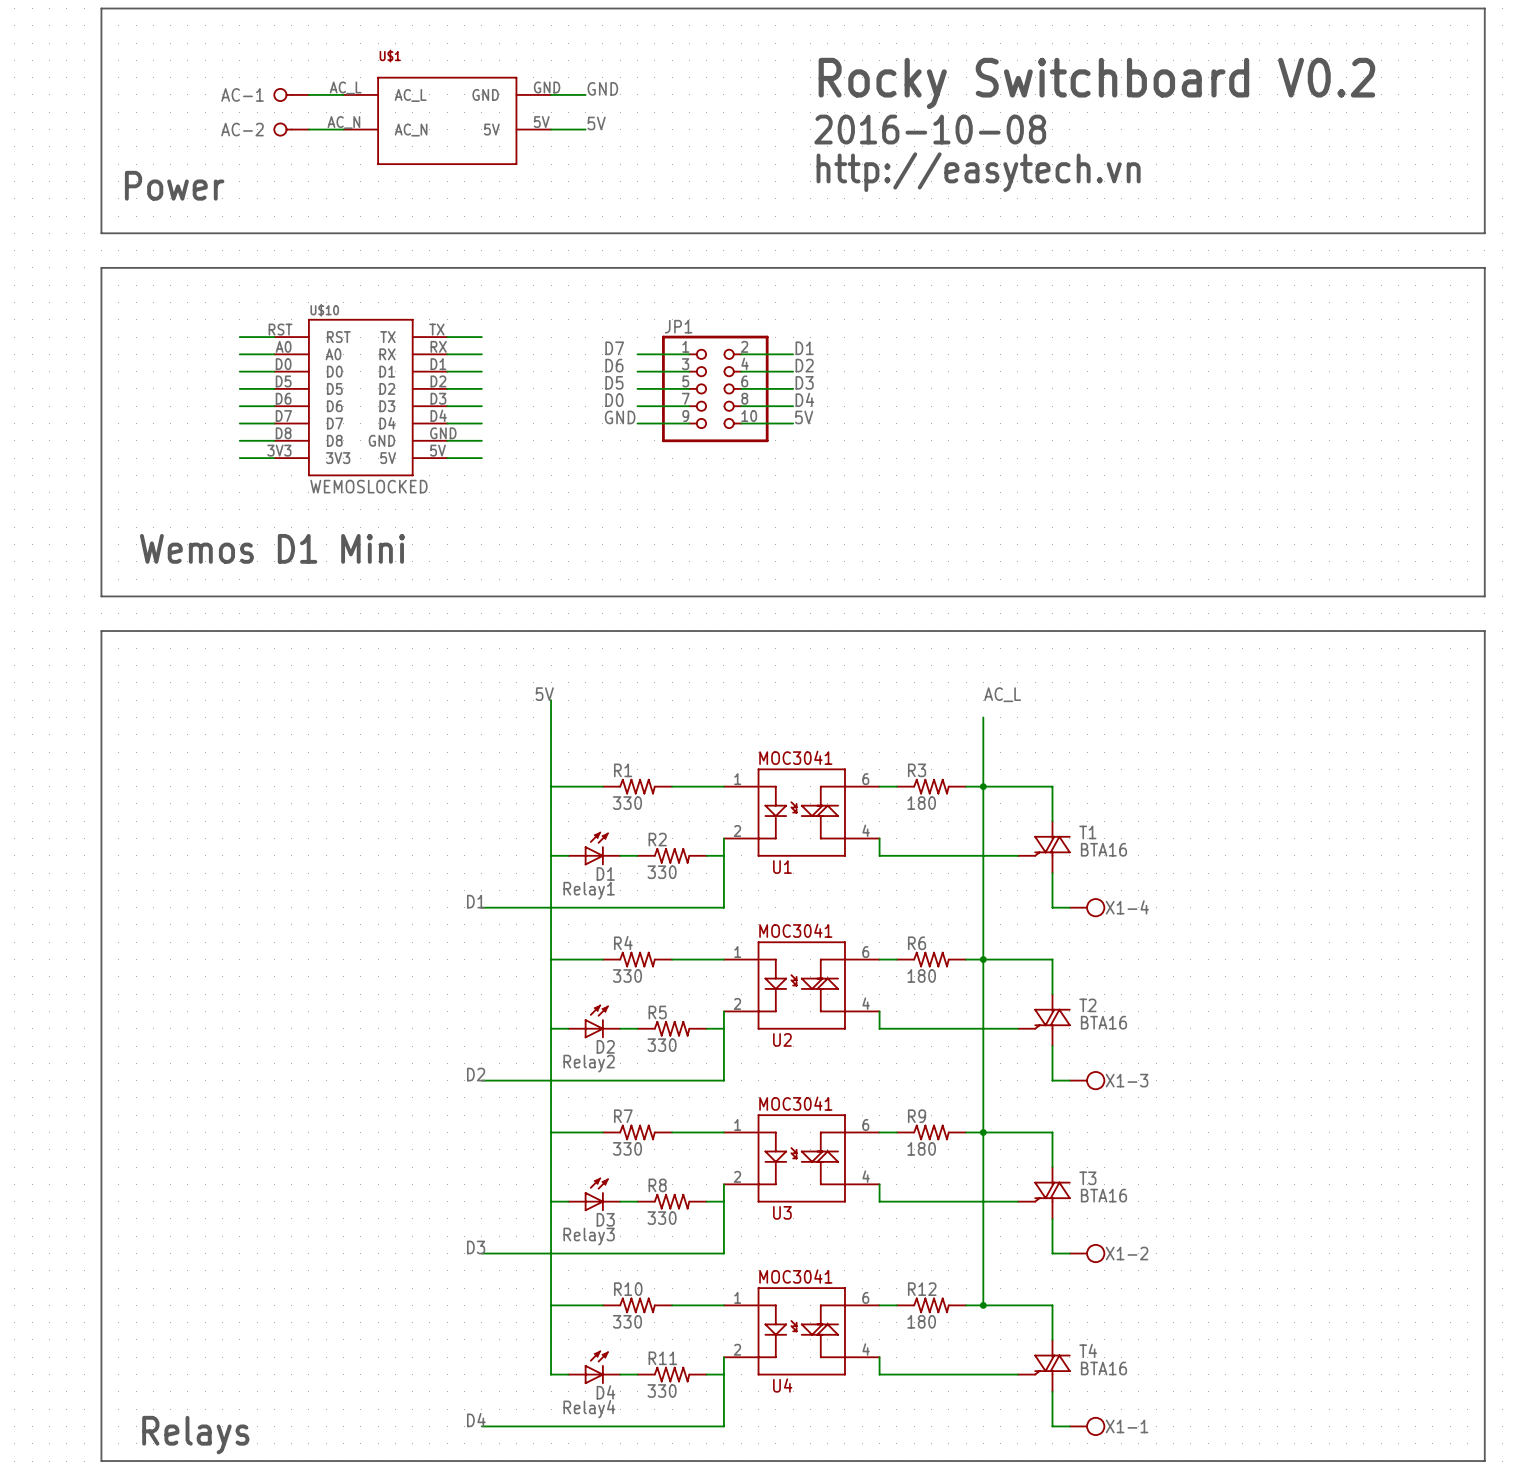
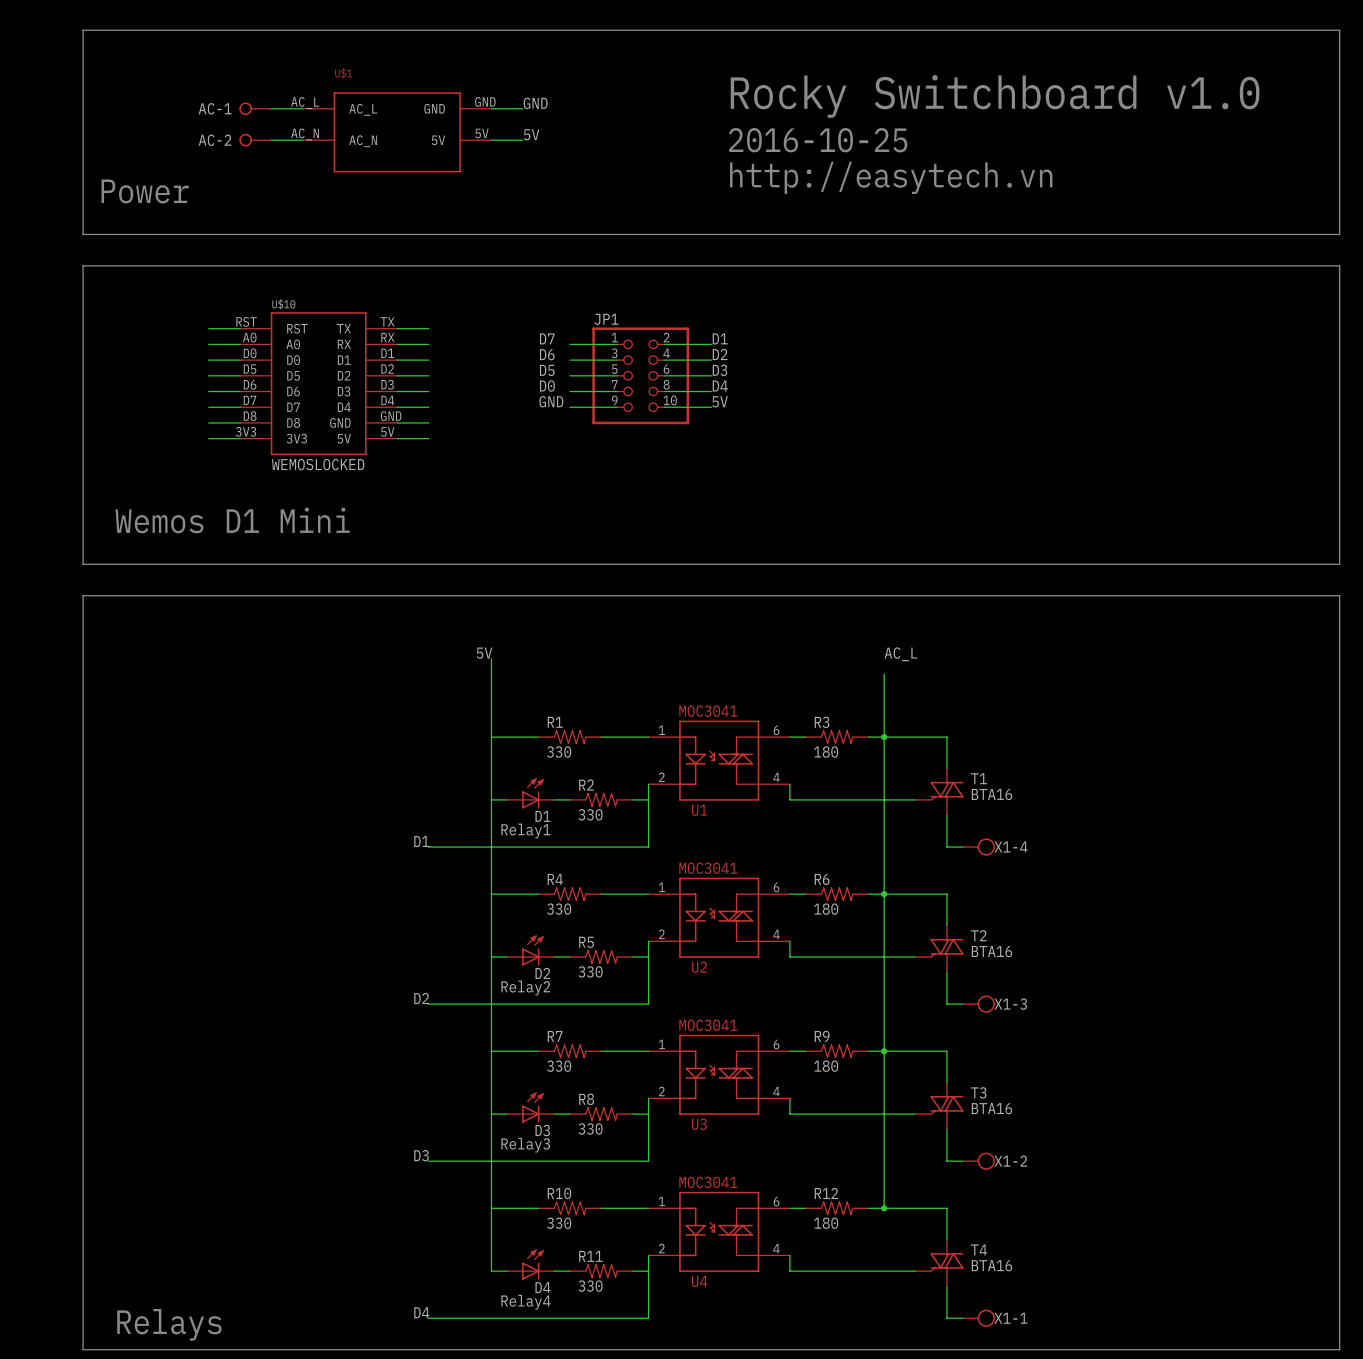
text: Rocky Switchboard V0.2 (1096, 83) -> Rocky Switchboard v1.0 (995, 96)
text: 2016-10-08 (930, 129) -> 2016-10-25 (818, 140)

